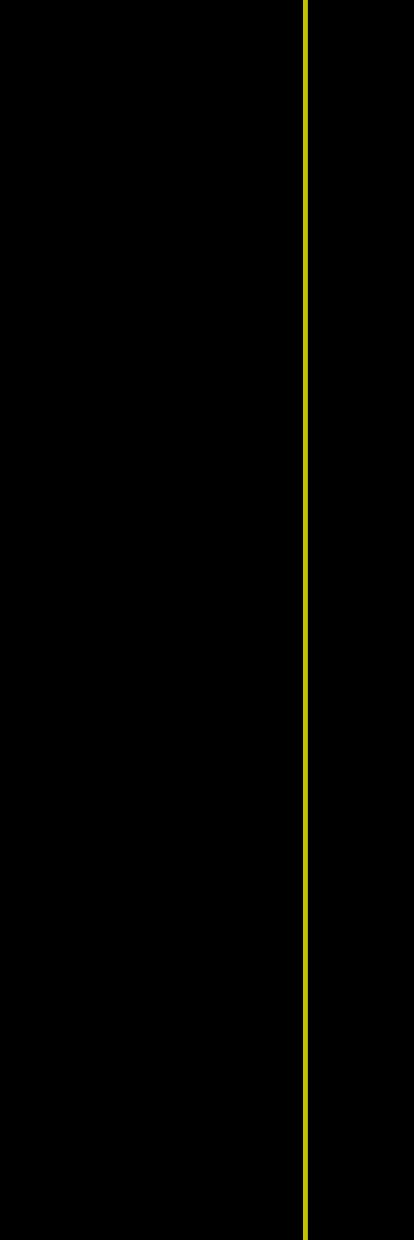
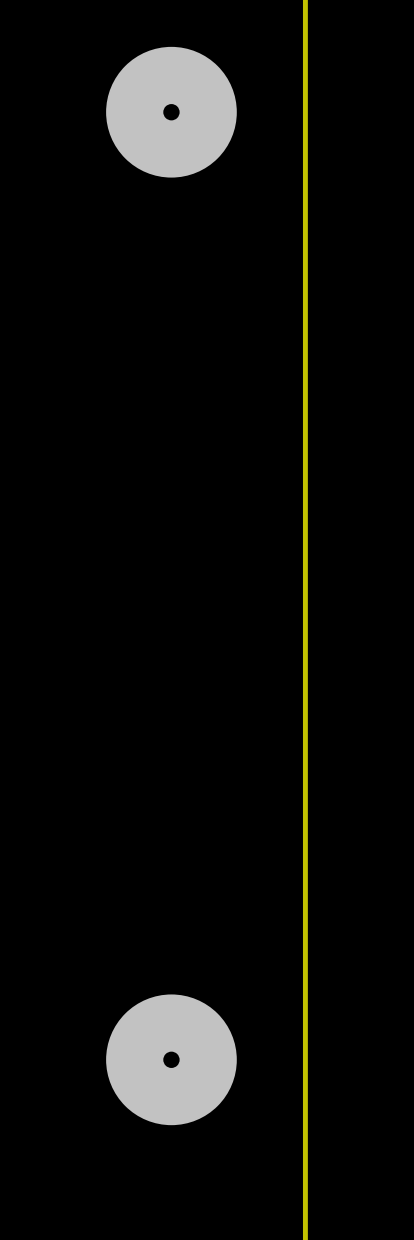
via: none -> (171, 112)
via: none -> (171, 1059)

